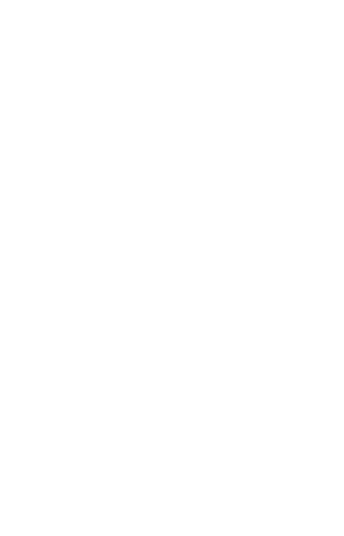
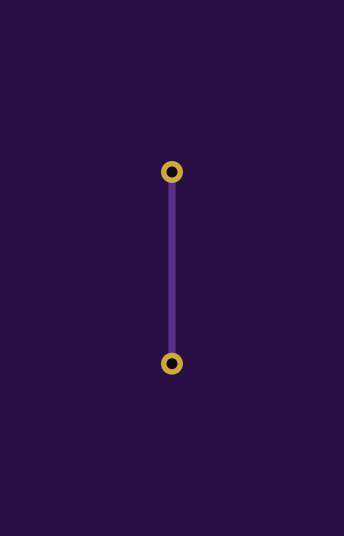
track: none -> (171, 171) (171, 363)
via: none -> (171, 171)
via: none -> (171, 363)

